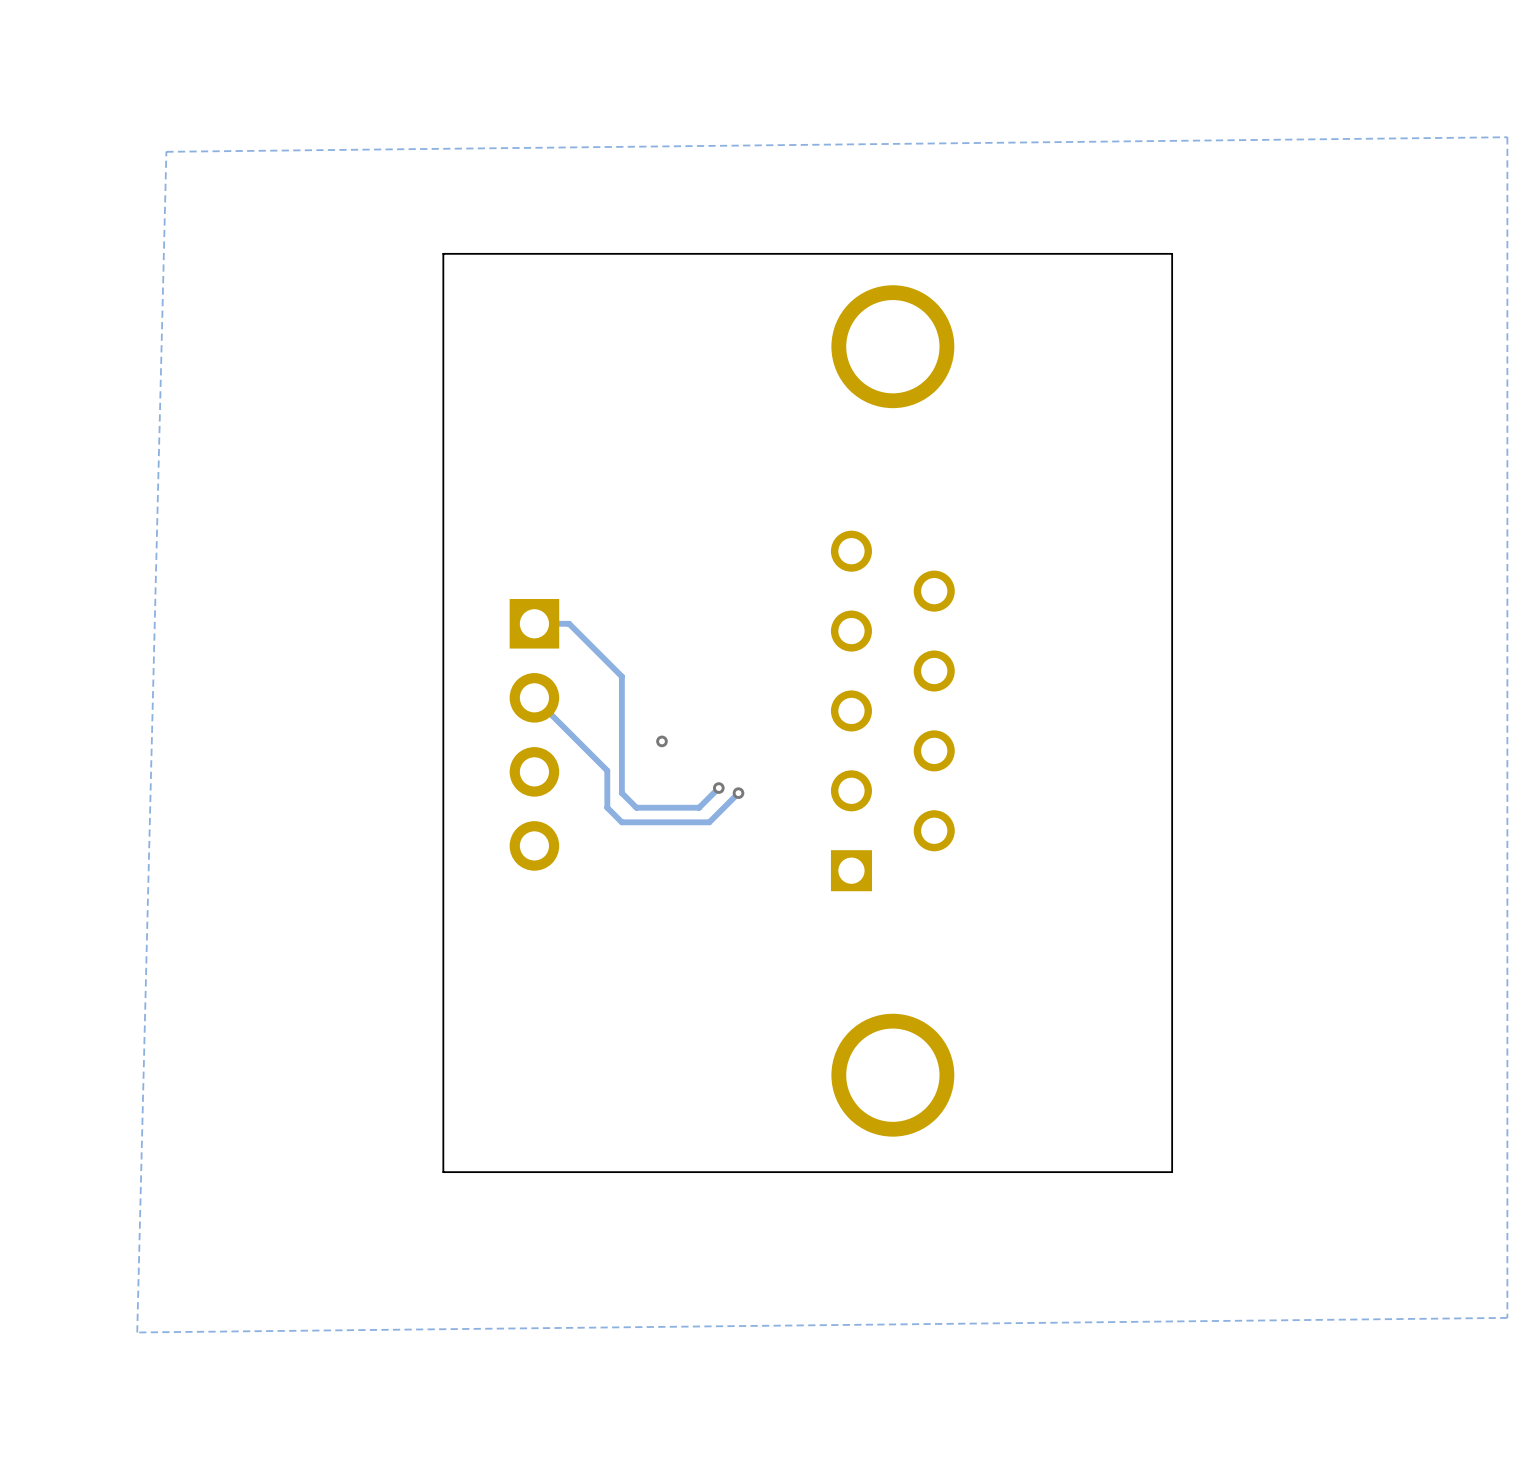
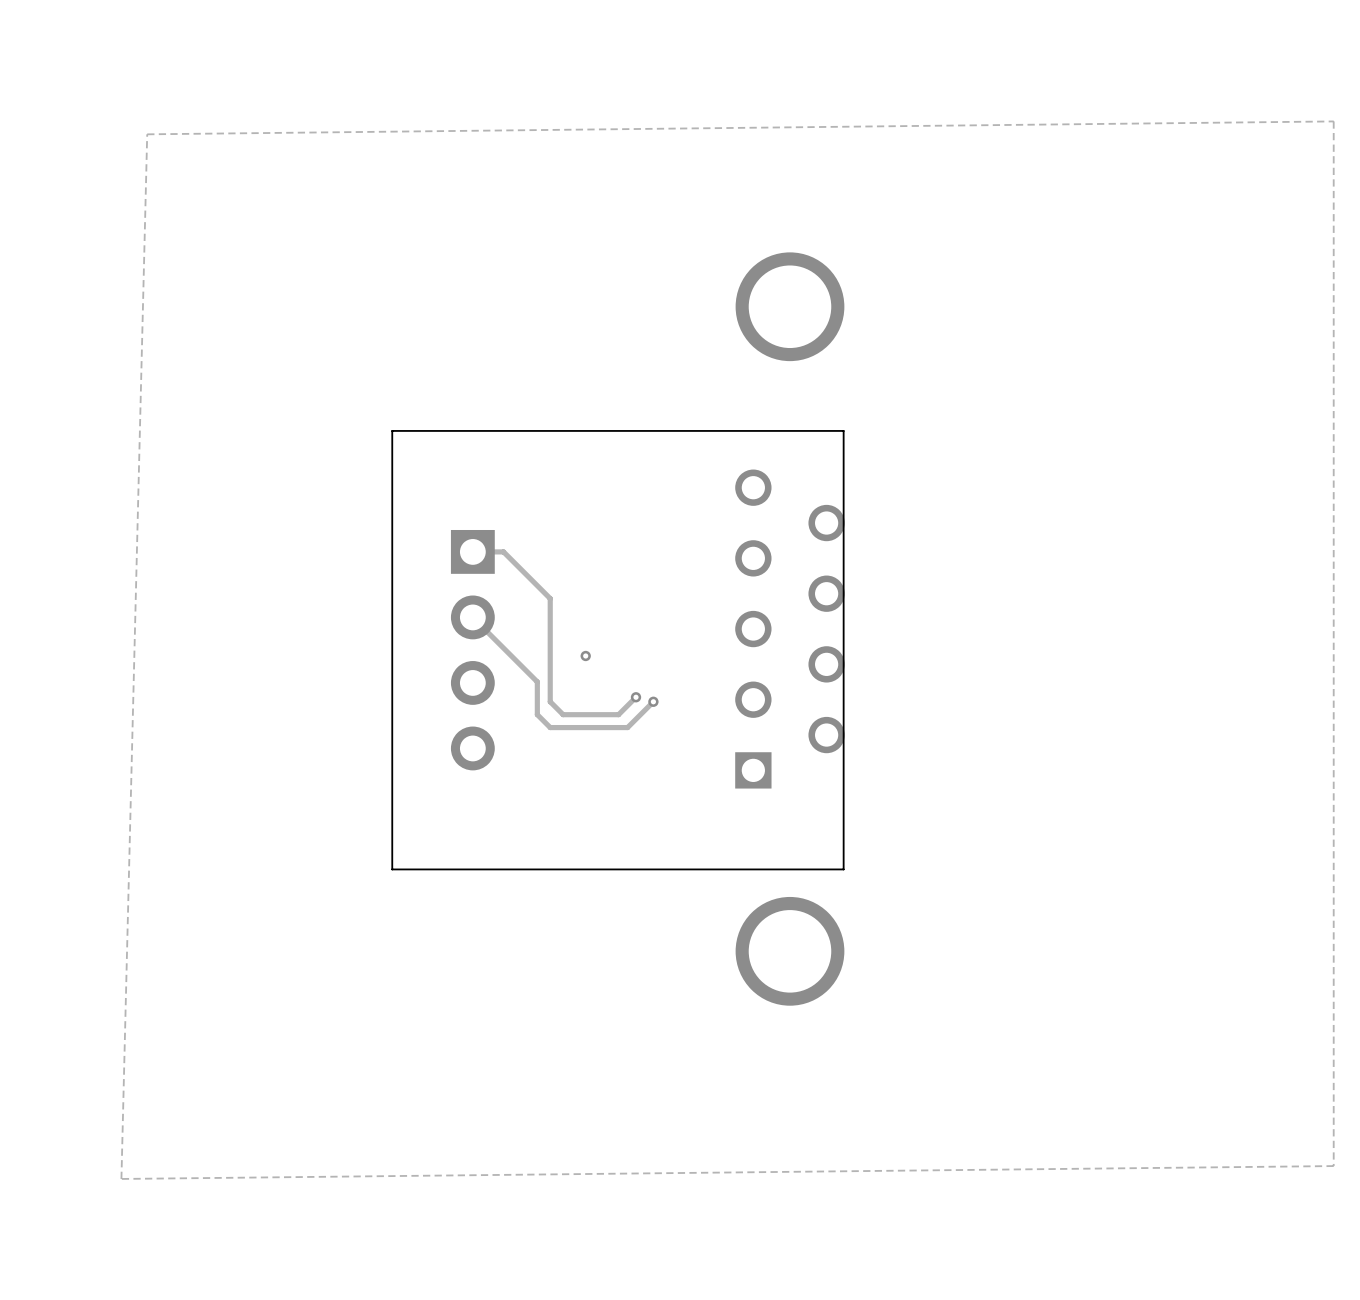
board edge: (443, 487) (443, 253) (1172, 253) (1172, 1172) (443, 1172) (443, 982) -> (392, 430) (843, 430) (843, 869) (392, 869)

